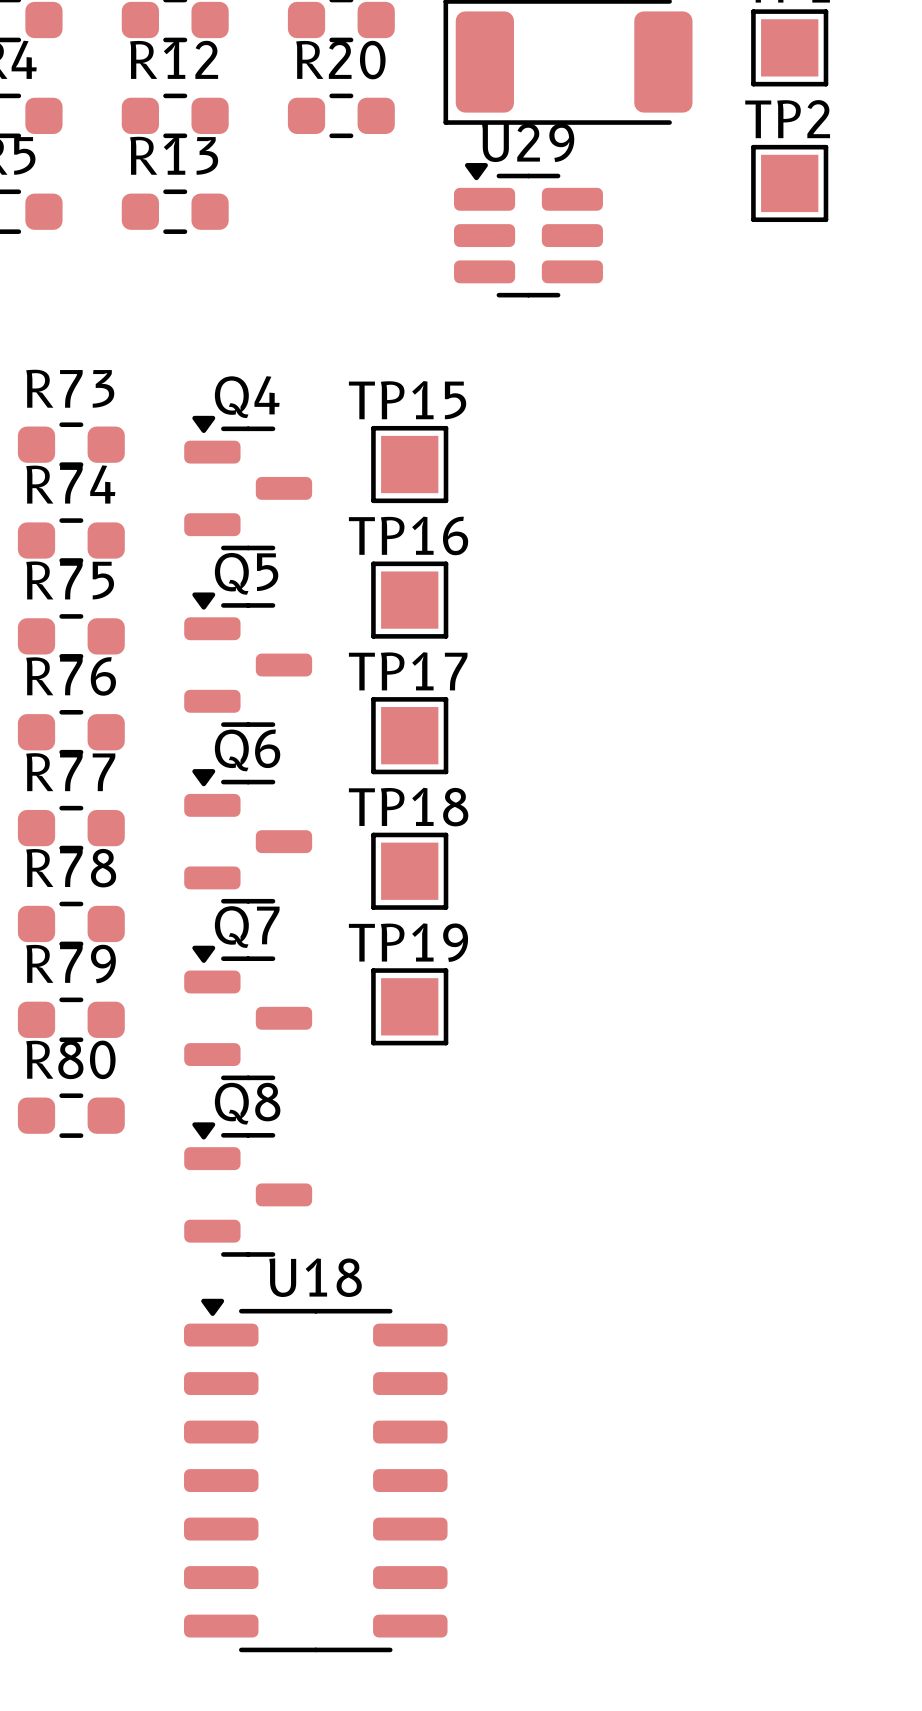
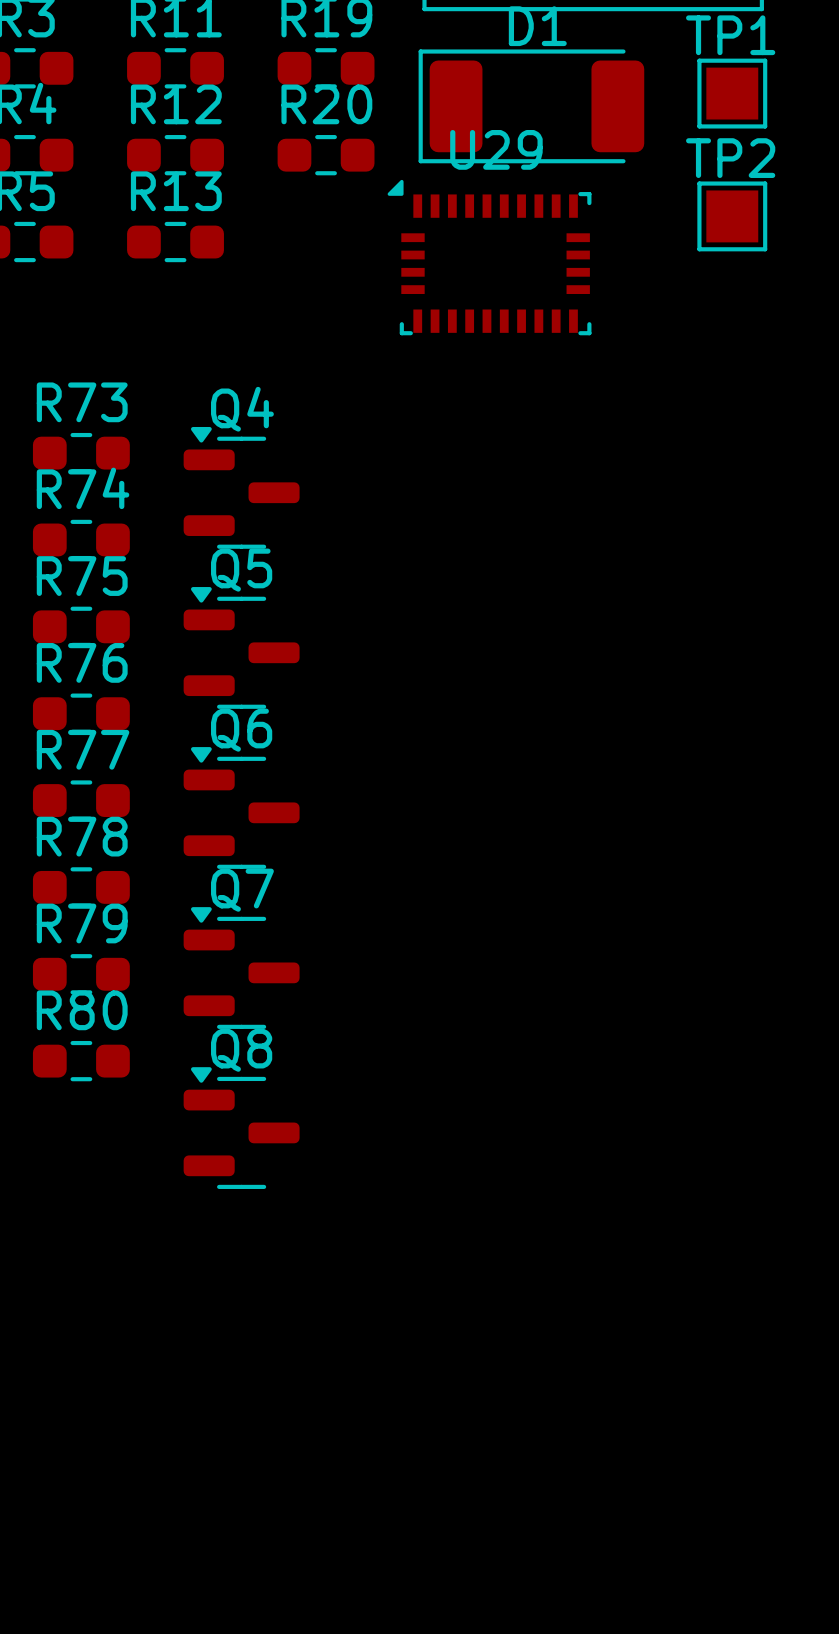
U29 footprint: [454, 163, 603, 298] -> [387, 179, 592, 336]
TP15: (409, 464) -> none
TP16: (409, 600) -> none
TP17: (409, 735) -> none
TP18: (409, 871) -> none
TP19: (409, 1006) -> none
U18: (315, 1475) -> none

